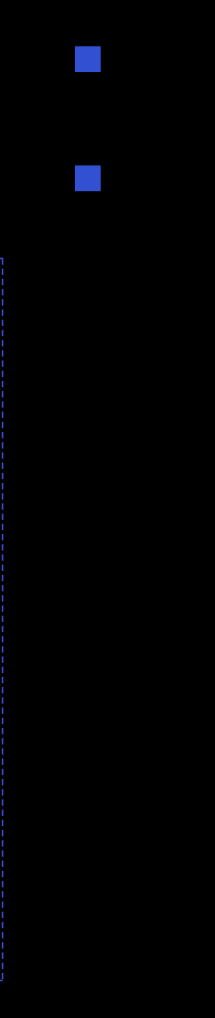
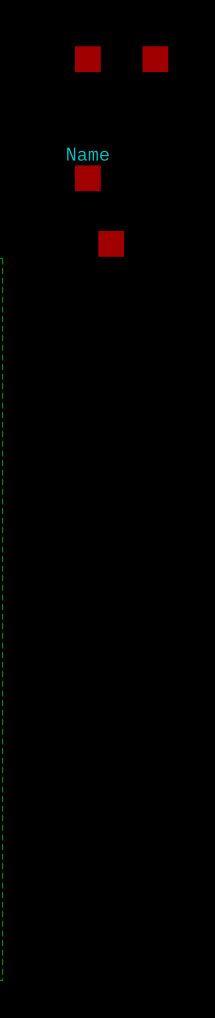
part side: bottom (87, 59) -> top (87, 59)
part: none -> (155, 59)
part side: bottom (87, 178) -> top (87, 178)
part: none -> (111, 243)

